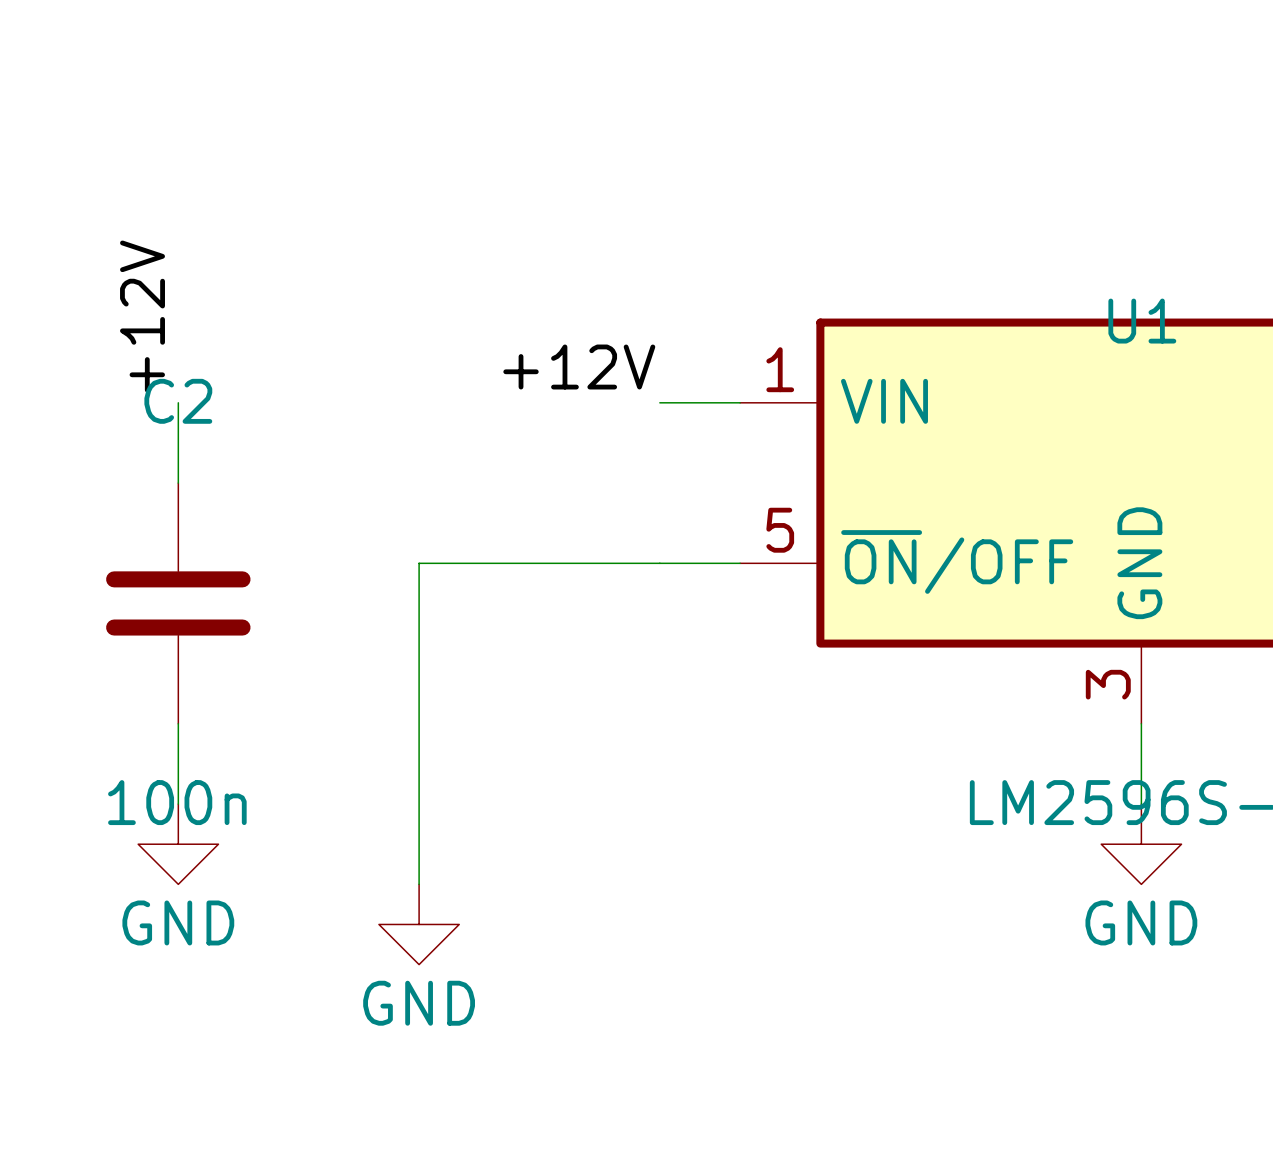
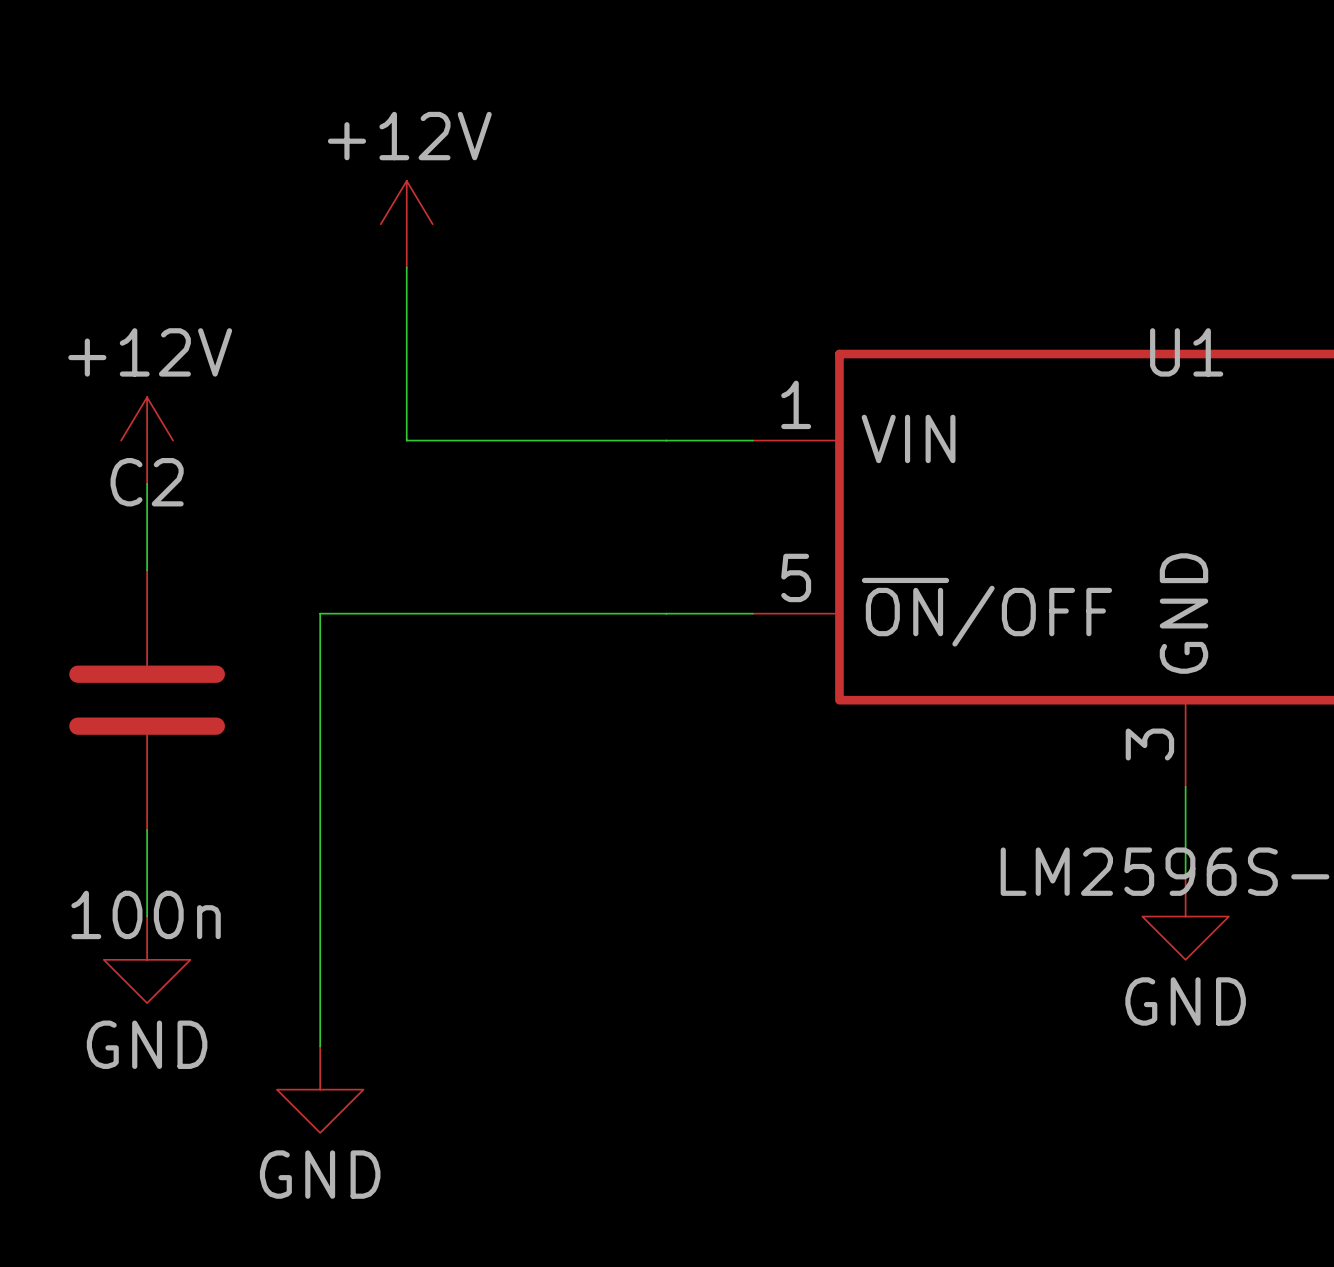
power symbol: none -> +12V (406, 224)
wire: none -> (406, 267) (406, 440) (666, 440)
label: +12V (142, 316) -> none
label: +12V (579, 367) -> none
power symbol: none -> +12V (147, 440)
wire: (419, 563) (419, 884) -> (406, 613) (320, 613) (320, 1046)
C2 position: (178, 603) -> (147, 700)
power symbol position: GND (178, 844) -> GND (147, 959)
power symbol: GND (419, 924) -> none
power symbol: none -> GND (320, 1089)

